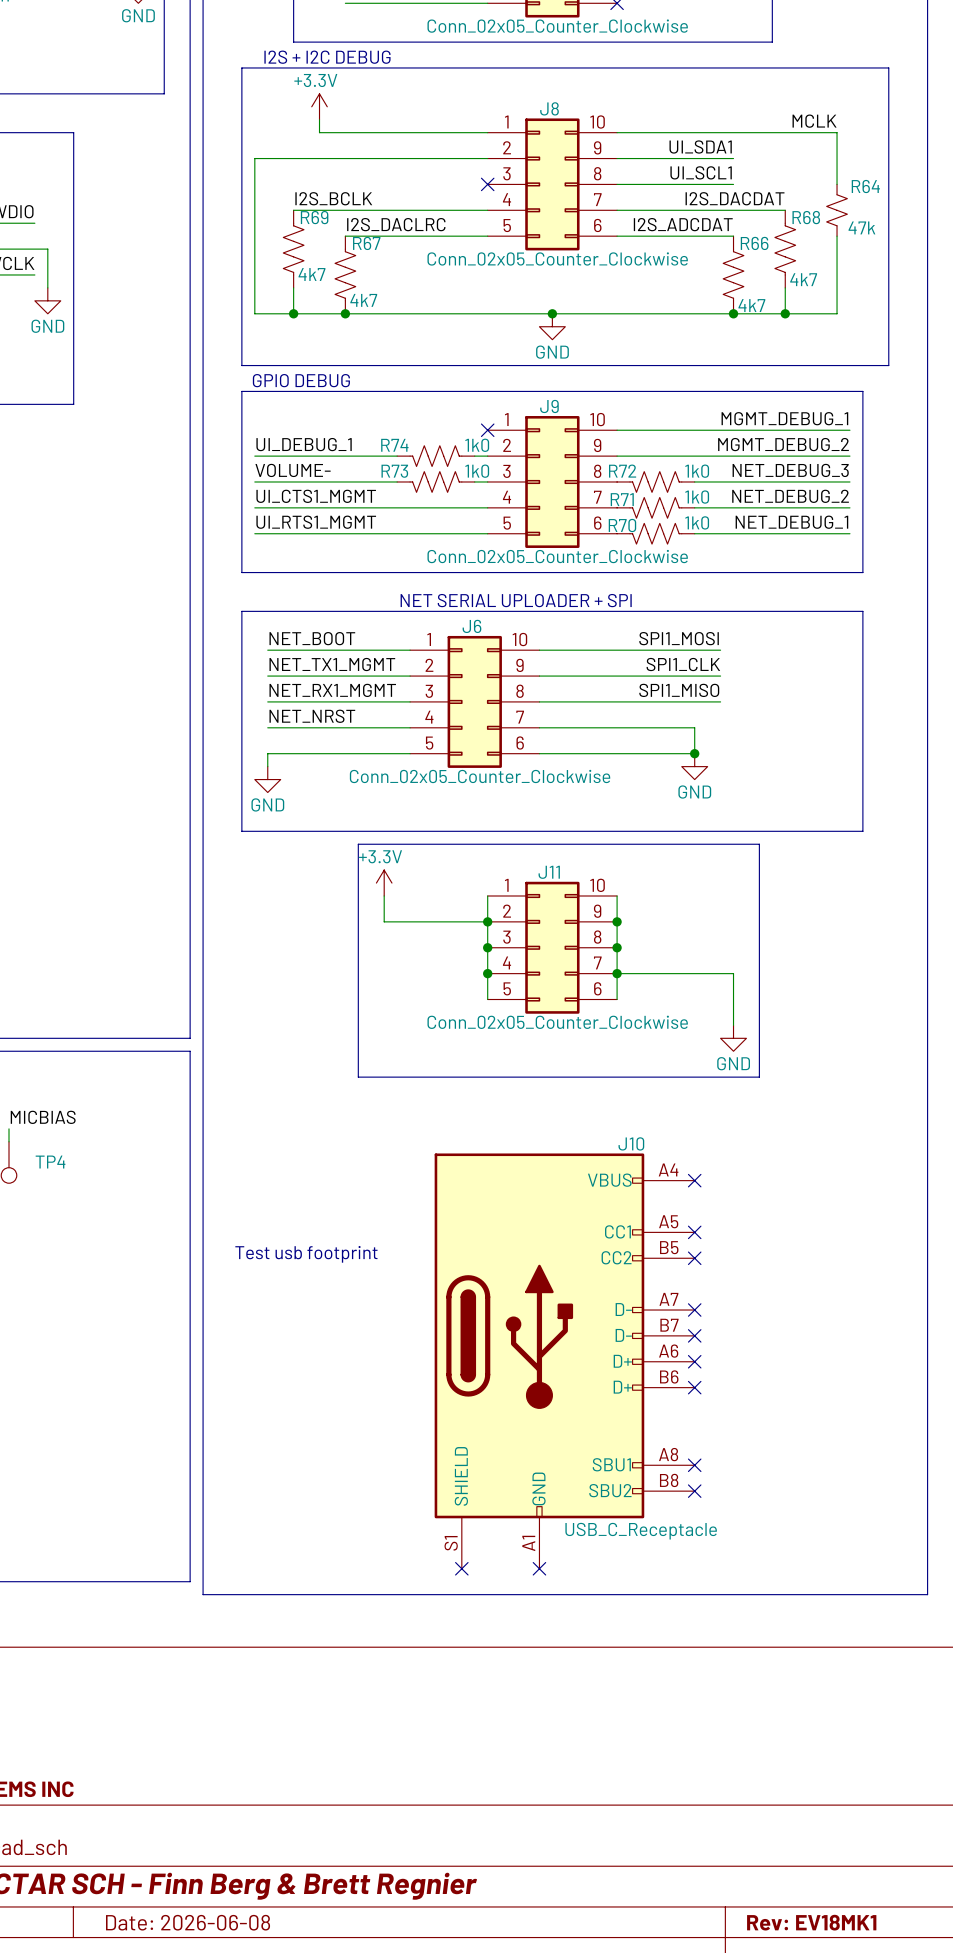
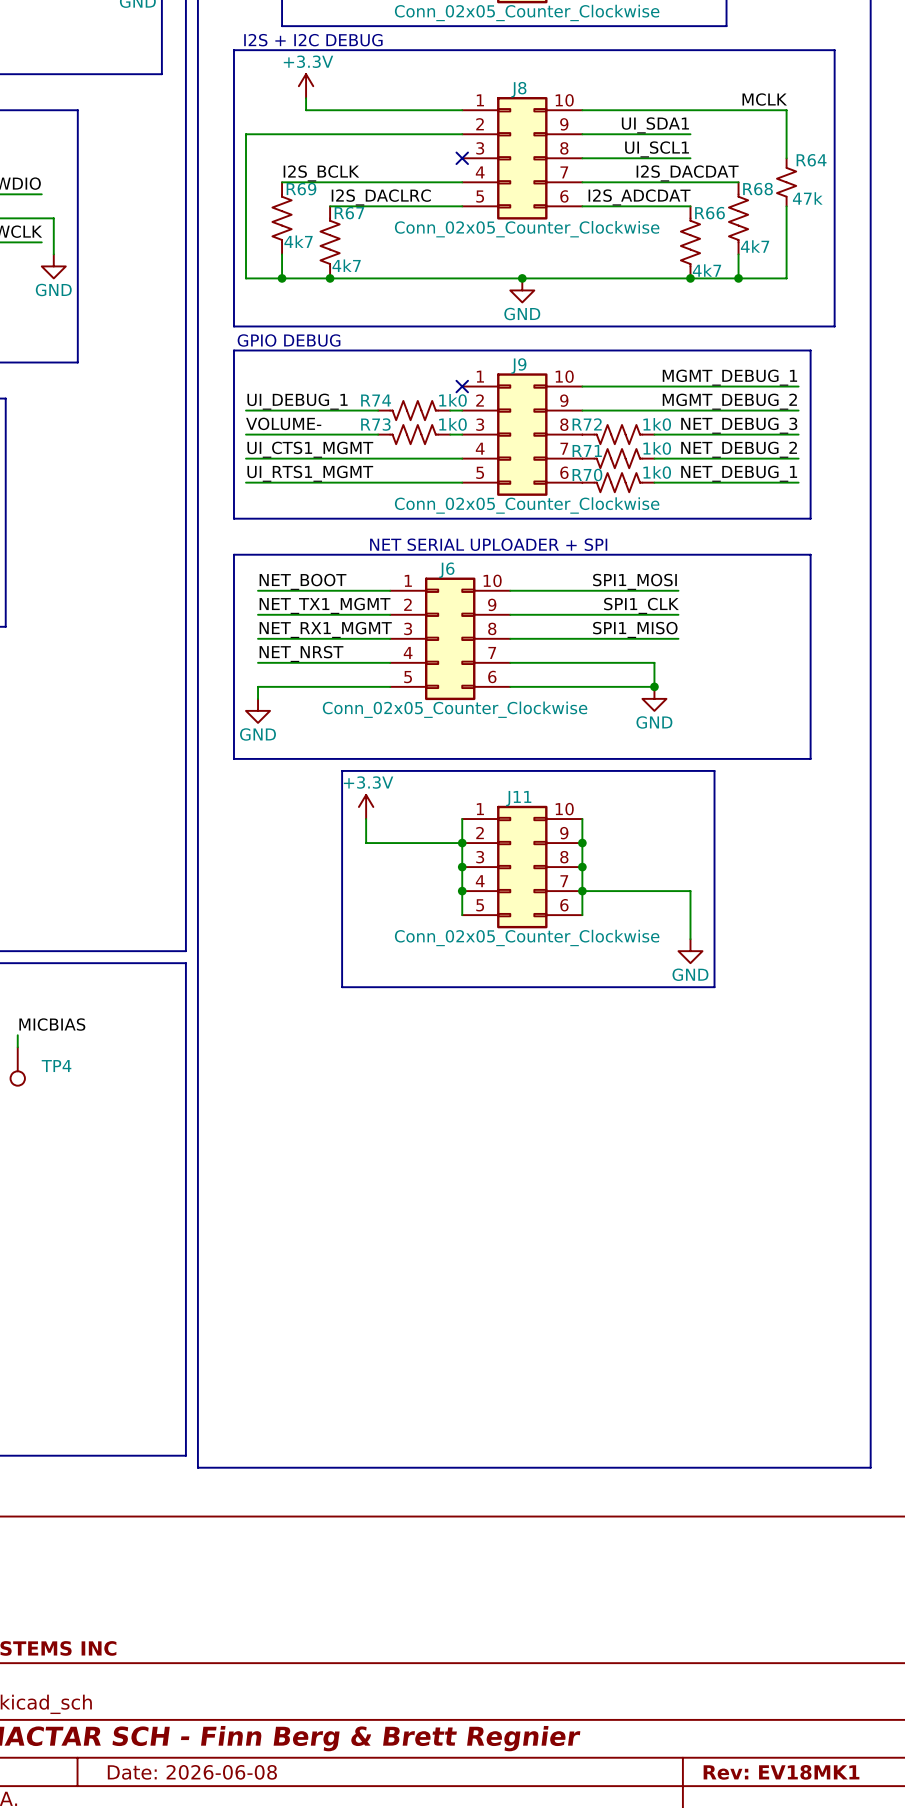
no-connect mark: (694, 1180) -> none
no-connect mark: (694, 1232) -> none
text: Test usb footprint (306, 1254) -> none
no-connect mark: (694, 1258) -> none
no-connect mark: (694, 1310) -> none
no-connect mark: (694, 1335) -> none
J10: USB_C_Receptacle (564, 1361) -> none
no-connect mark: (694, 1361) -> none
no-connect mark: (694, 1387) -> none
no-connect mark: (694, 1465) -> none
no-connect mark: (694, 1491) -> none
no-connect mark: (461, 1568) -> none
no-connect mark: (539, 1568) -> none

